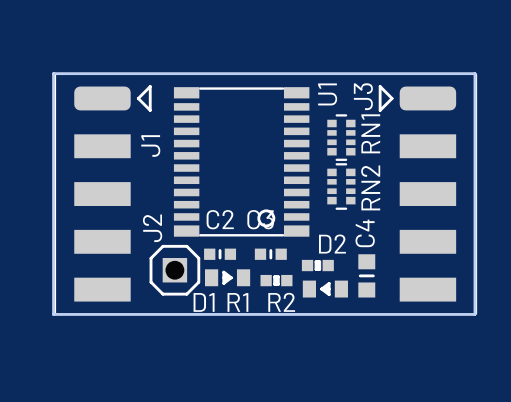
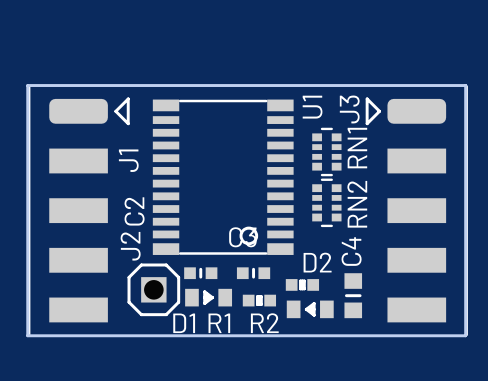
C2 name rotation: 0° (220, 219) -> 90° counterclockwise (134, 211)
C2 name position: C2 (220, 219) -> C2 (134, 211)

